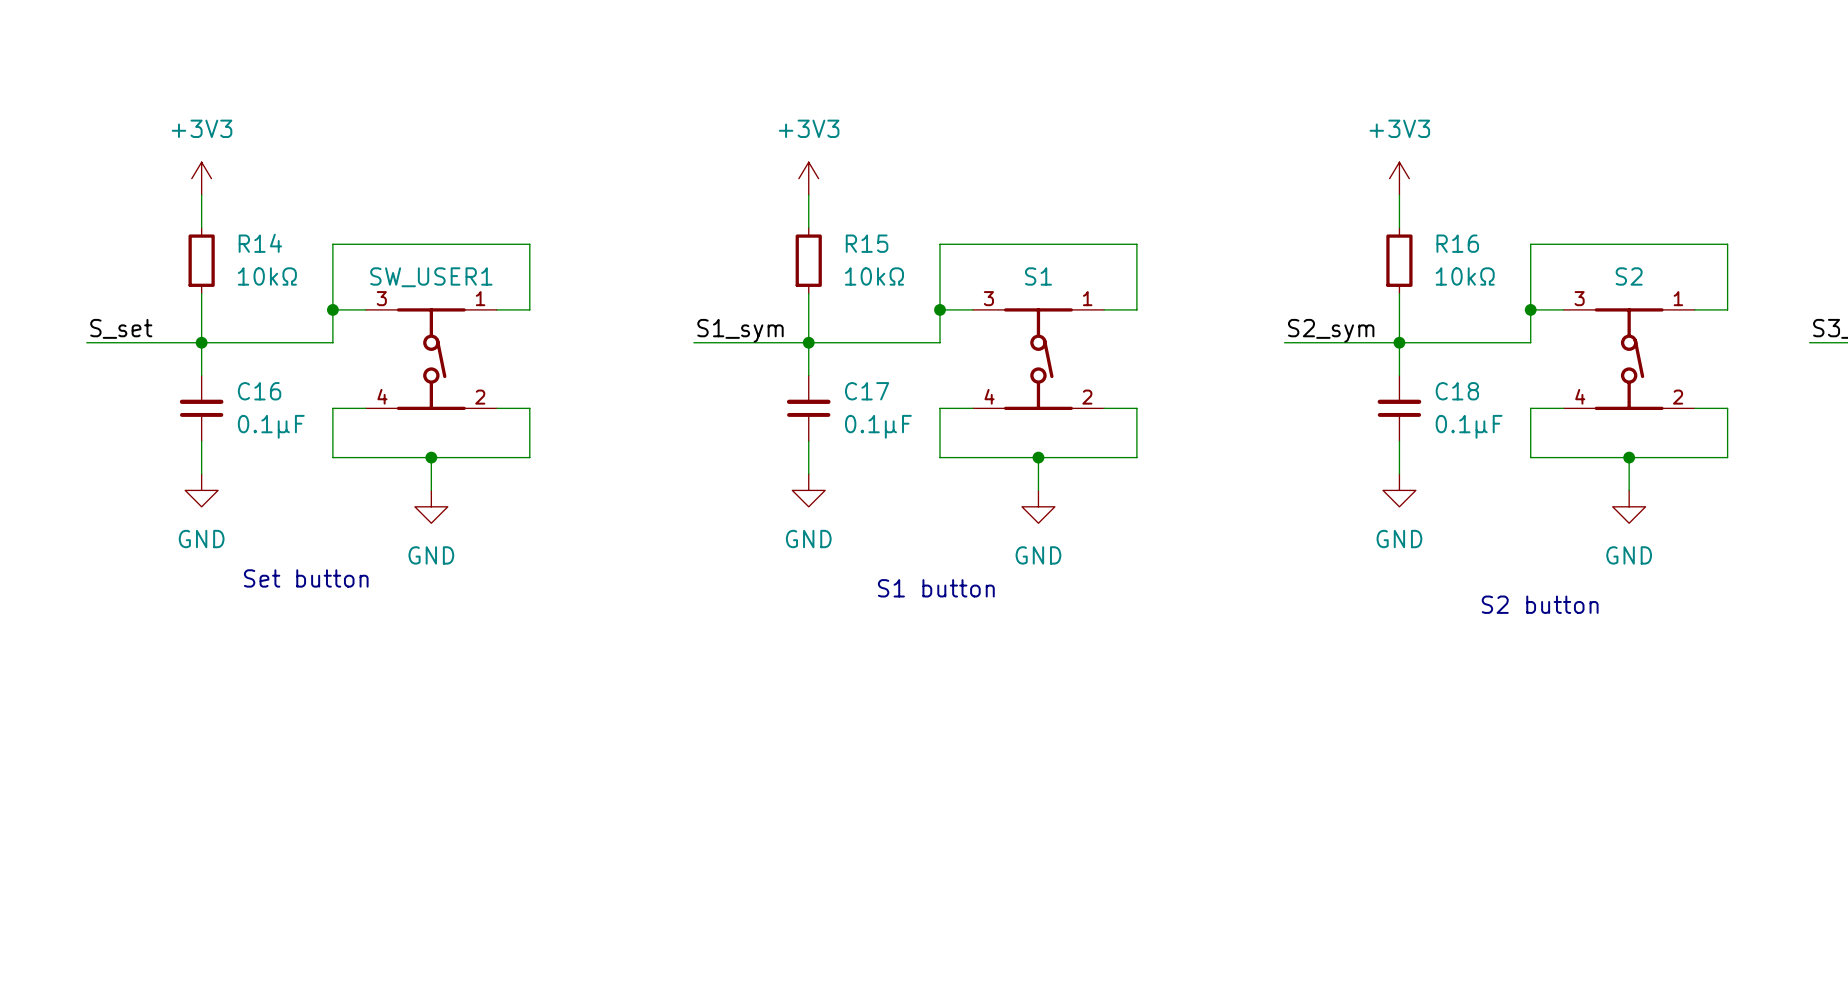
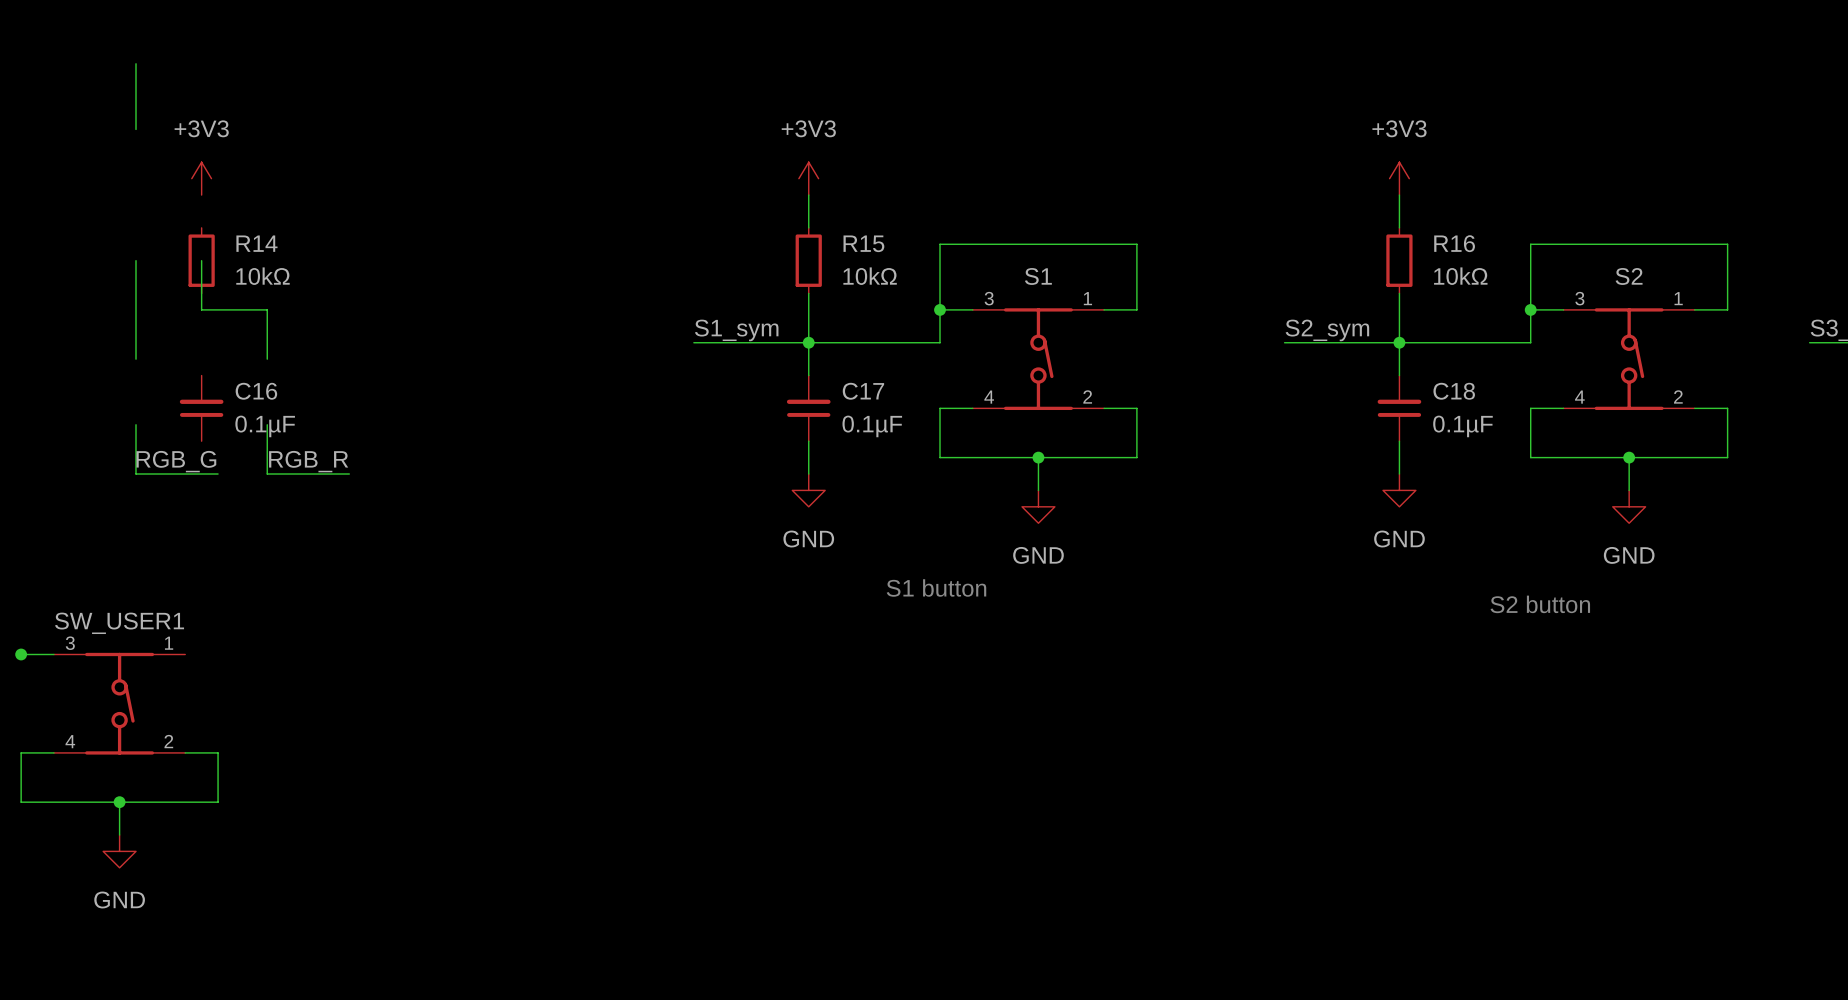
wire: none -> (136, 63) (136, 129)
wire: (201, 195) (201, 227) -> (201, 260) (201, 293)
wire: none -> (136, 260) (136, 359)
wire: (201, 309) (201, 375) -> (201, 309) (267, 309) (267, 359)
wire: (332, 309) (365, 309) -> none
junction: (332, 309) -> none
wire: (496, 309) (529, 309) (529, 244) (332, 244) (332, 342) (86, 342) -> none
label: S_set (121, 328) -> none
junction: (201, 342) -> none
SW_USER1 position: (431, 359) -> (119, 703)
wire: (365, 408) (332, 408) (332, 457) (529, 457) (529, 408) (496, 408) -> none
wire: none -> (136, 424) (136, 474) (218, 474)
wire: none -> (267, 424) (267, 474) (349, 474)
wire: (201, 441) (201, 474) -> none
wire: (431, 457) (431, 490) -> none
junction: (431, 457) -> none
label: none -> RGB_G (176, 461)
label: none -> RGB_R (308, 461)
power symbol: GND (201, 490) -> none
power symbol: GND (431, 506) -> none
text: Set button (306, 578) -> none
wire: none -> (21, 654) (53, 654)
junction: none -> (21, 654)
wire: none -> (53, 752) (21, 752) (21, 802) (218, 802) (218, 752) (185, 752)
wire: none -> (119, 802) (119, 834)
junction: none -> (119, 802)
power symbol: none -> GND (119, 851)

